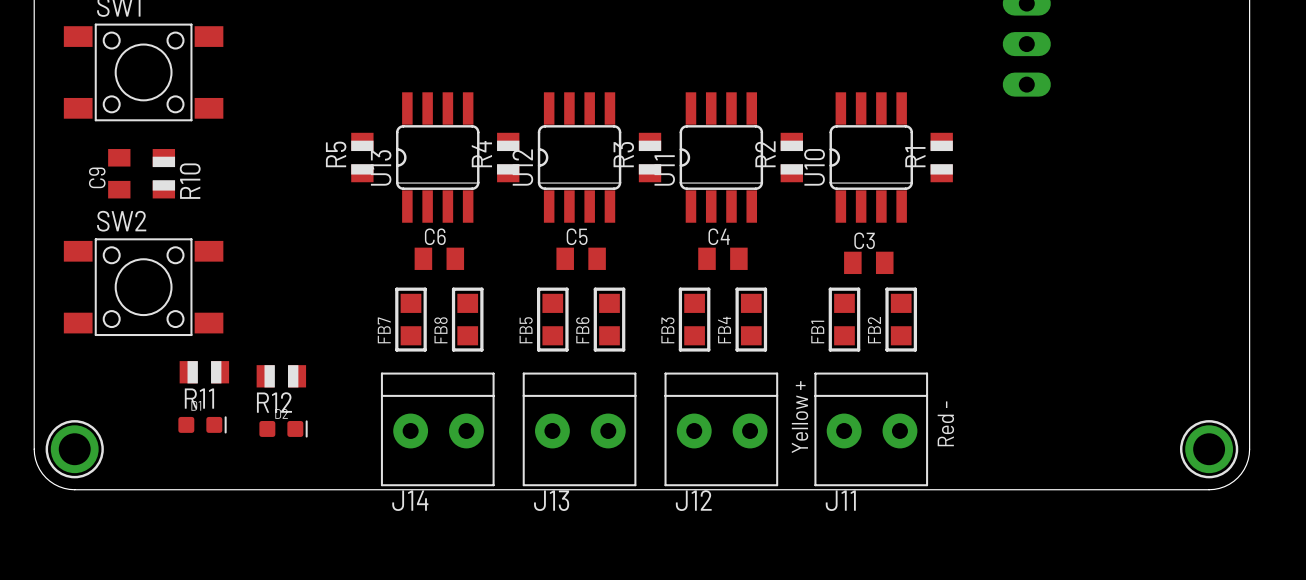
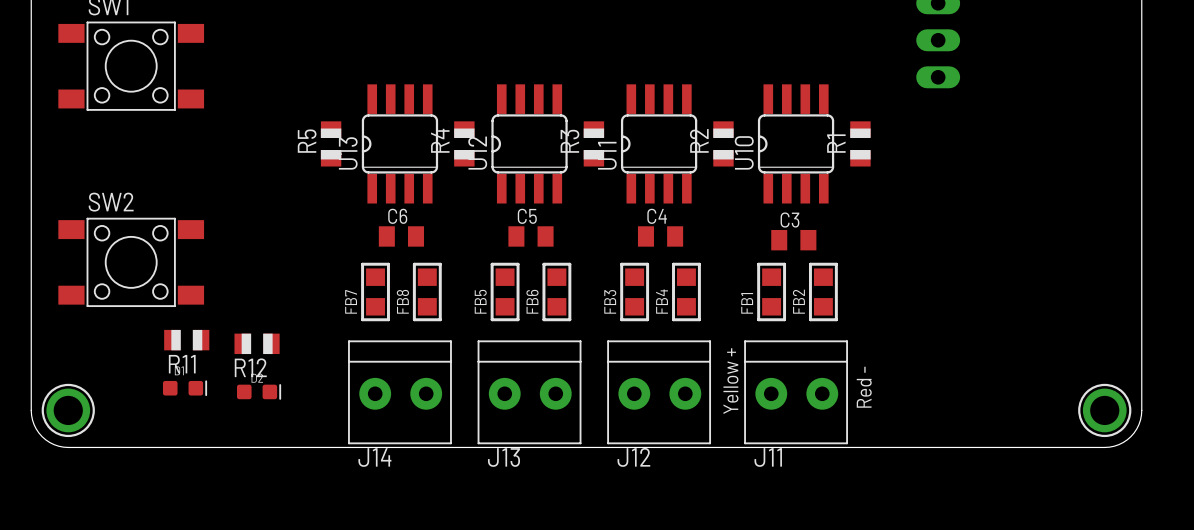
C9: (119, 173) -> none
R10: (163, 173) -> none

